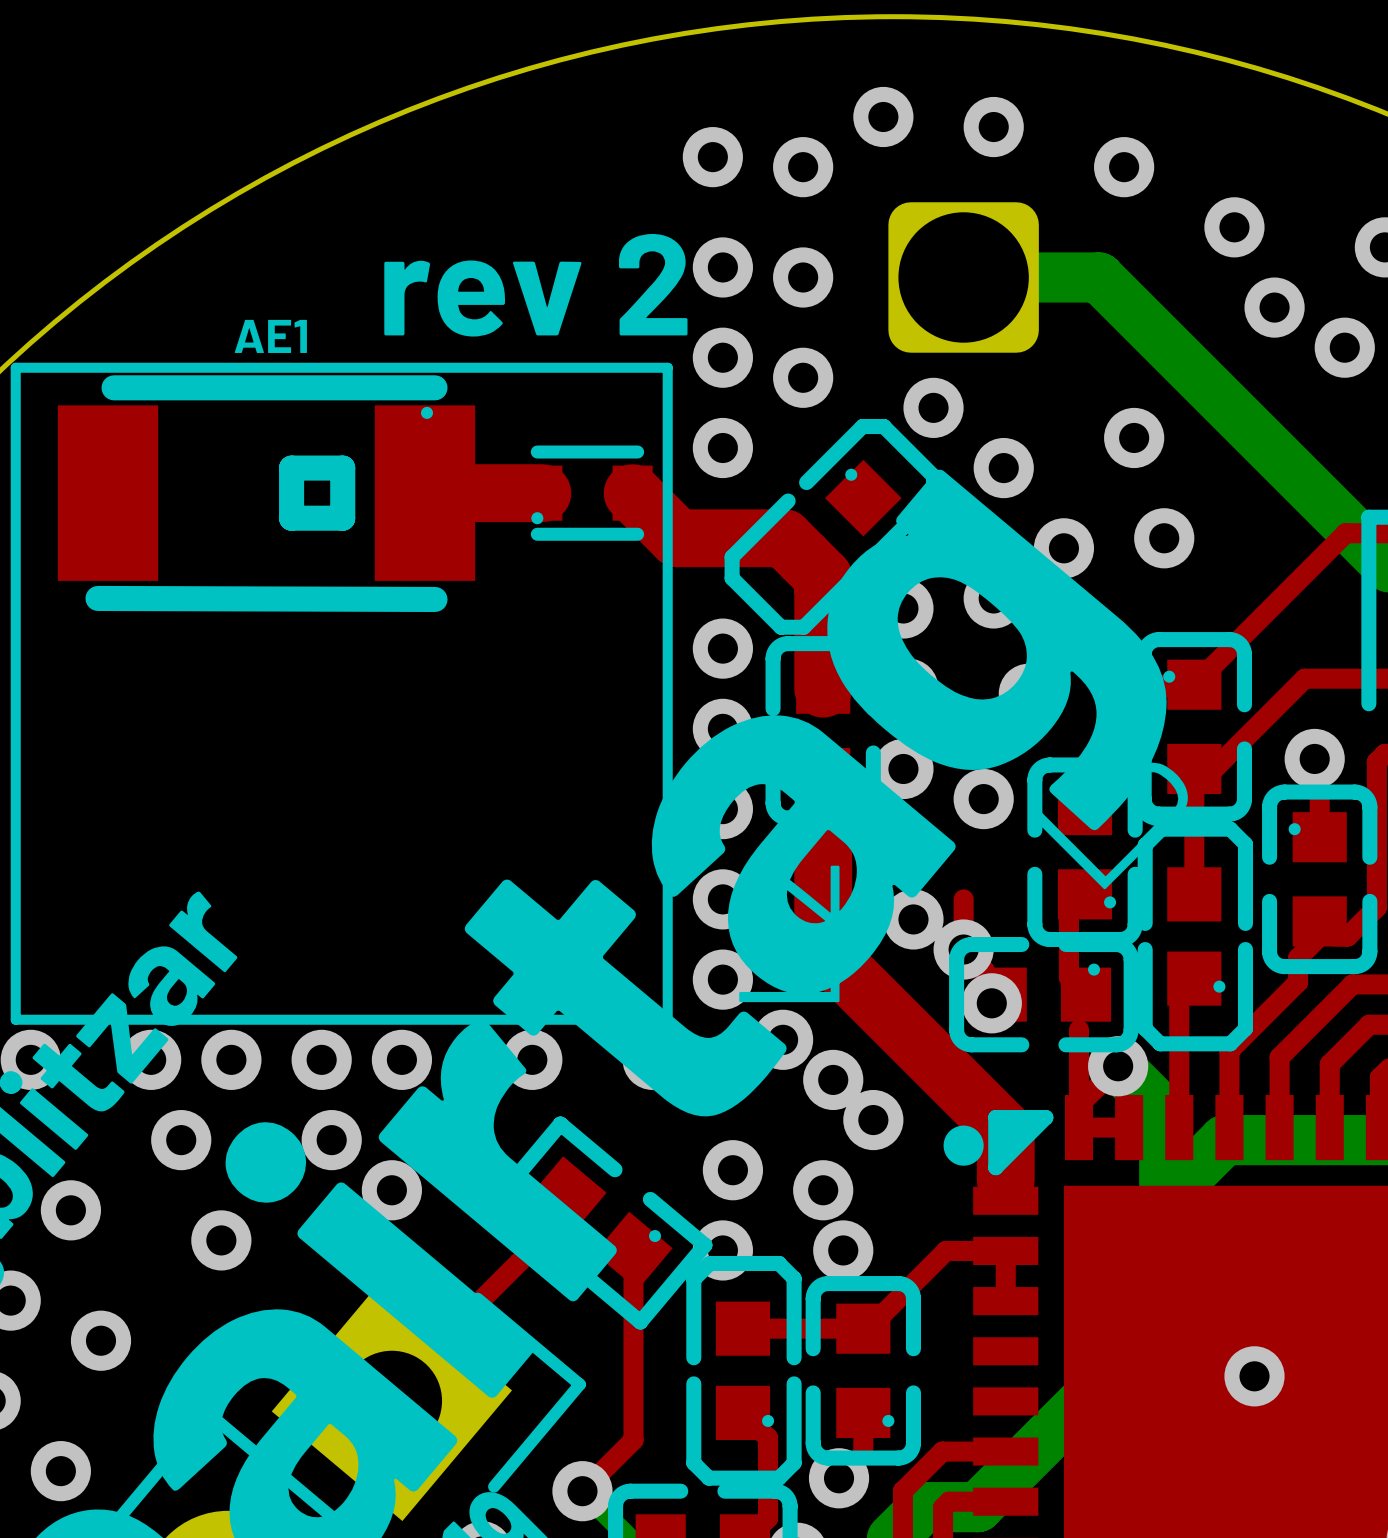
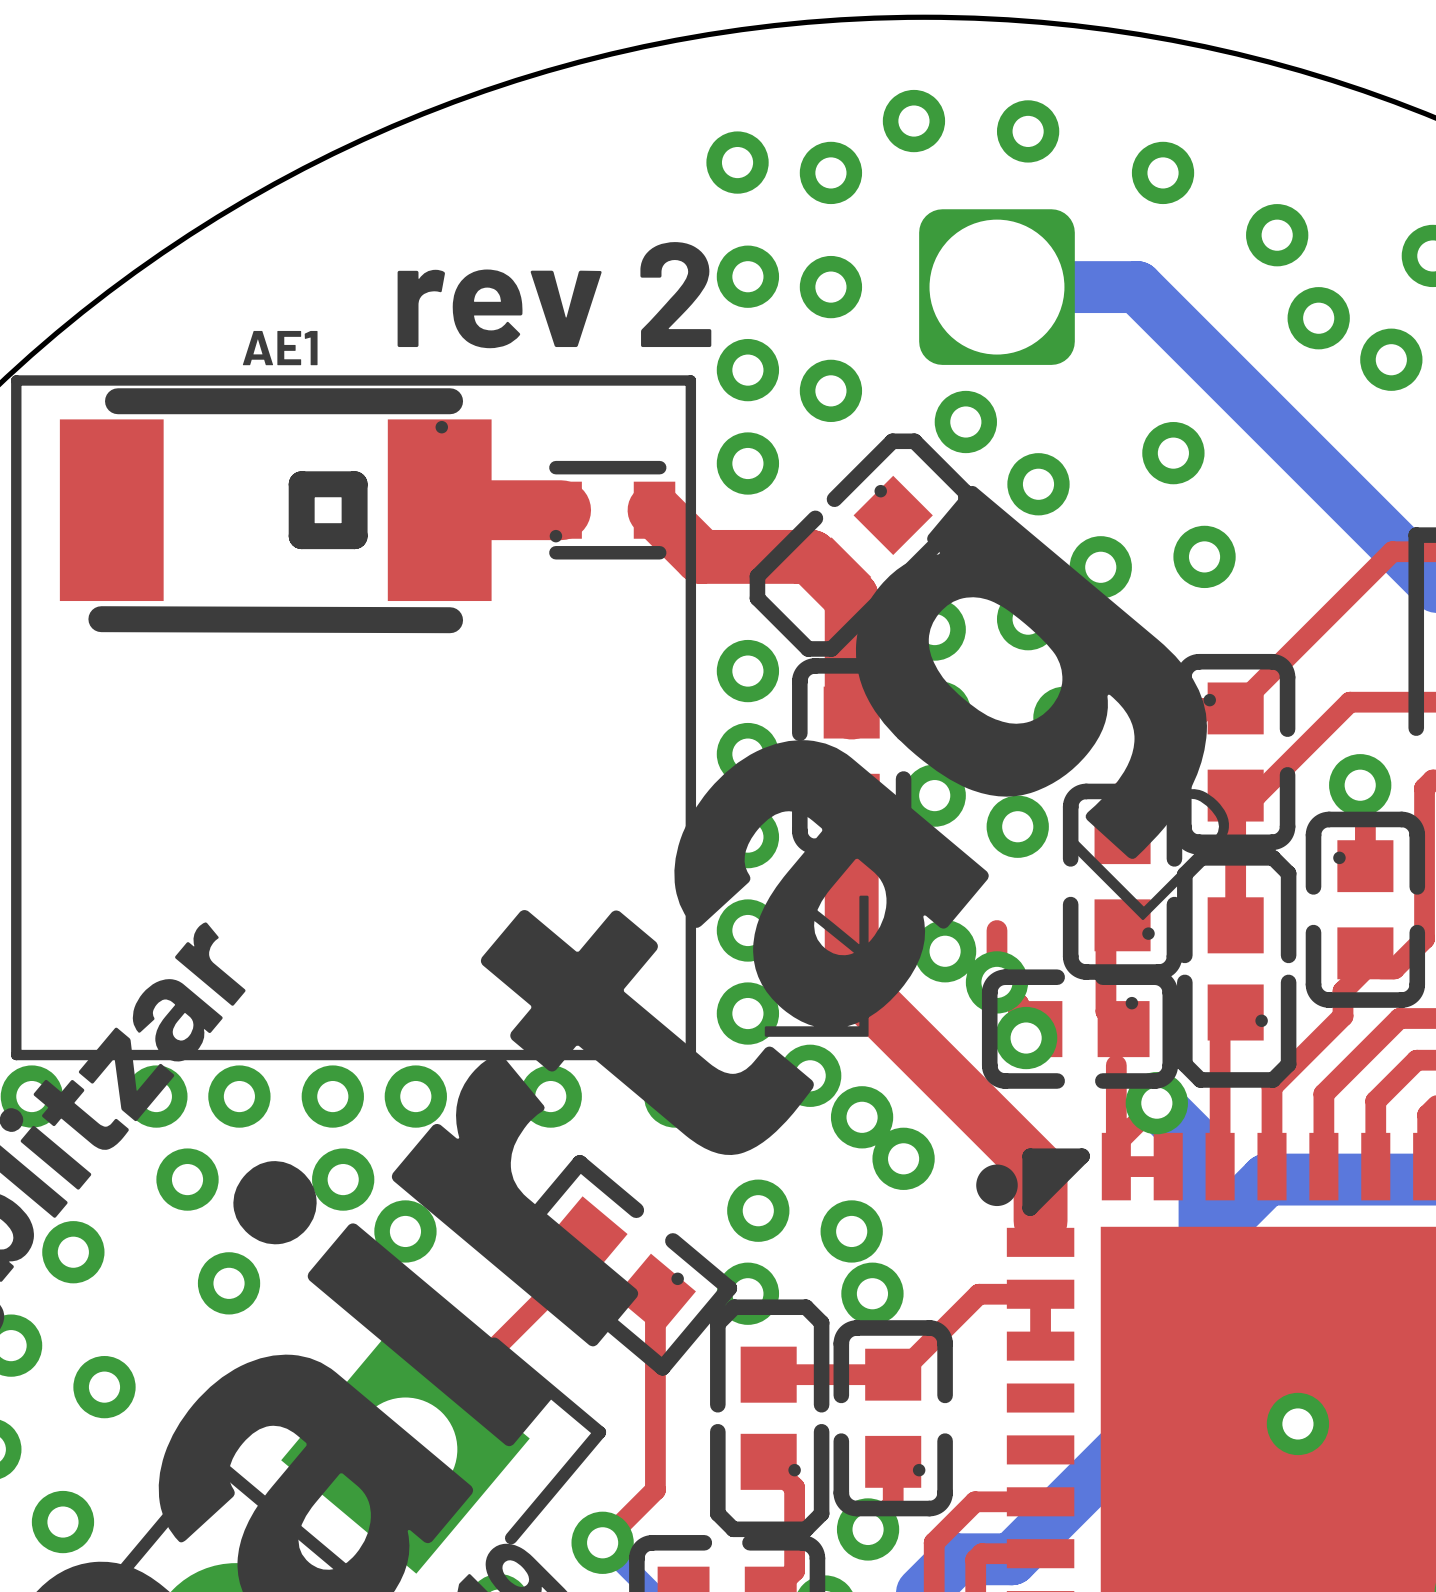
top track width: thick (632, 493) (677, 538) (784, 538) (823, 577) (823, 688) -> thin (654, 510) (701, 556) (811, 556) (851, 597) (851, 712)
top track width: thick (823, 809) (823, 949) (1005, 1132) (1005, 1180) -> thin (851, 837) (851, 982) (1040, 1171) (1040, 1221)

